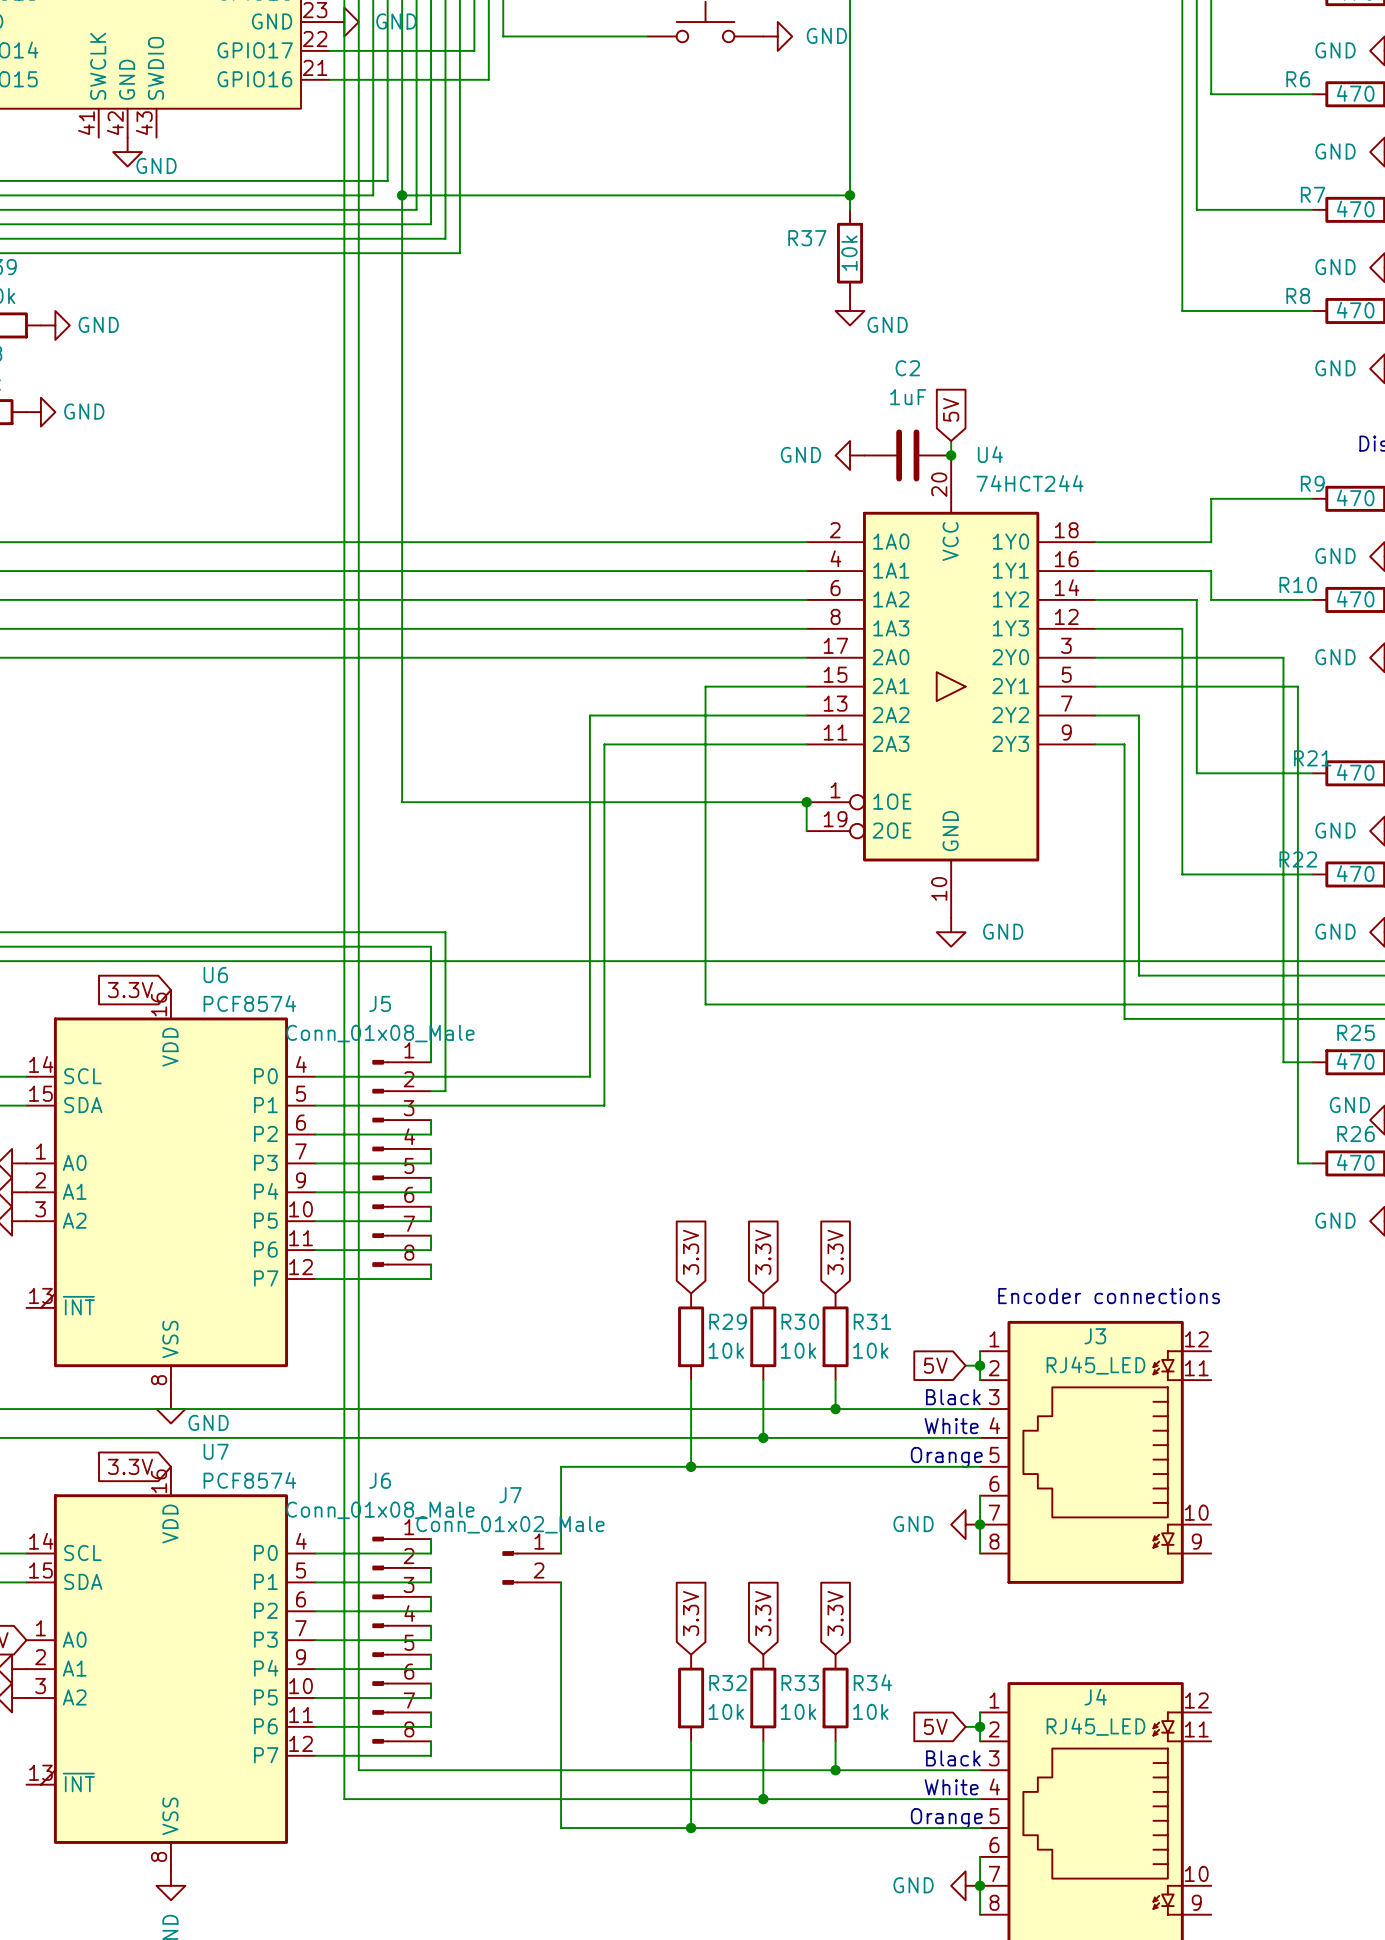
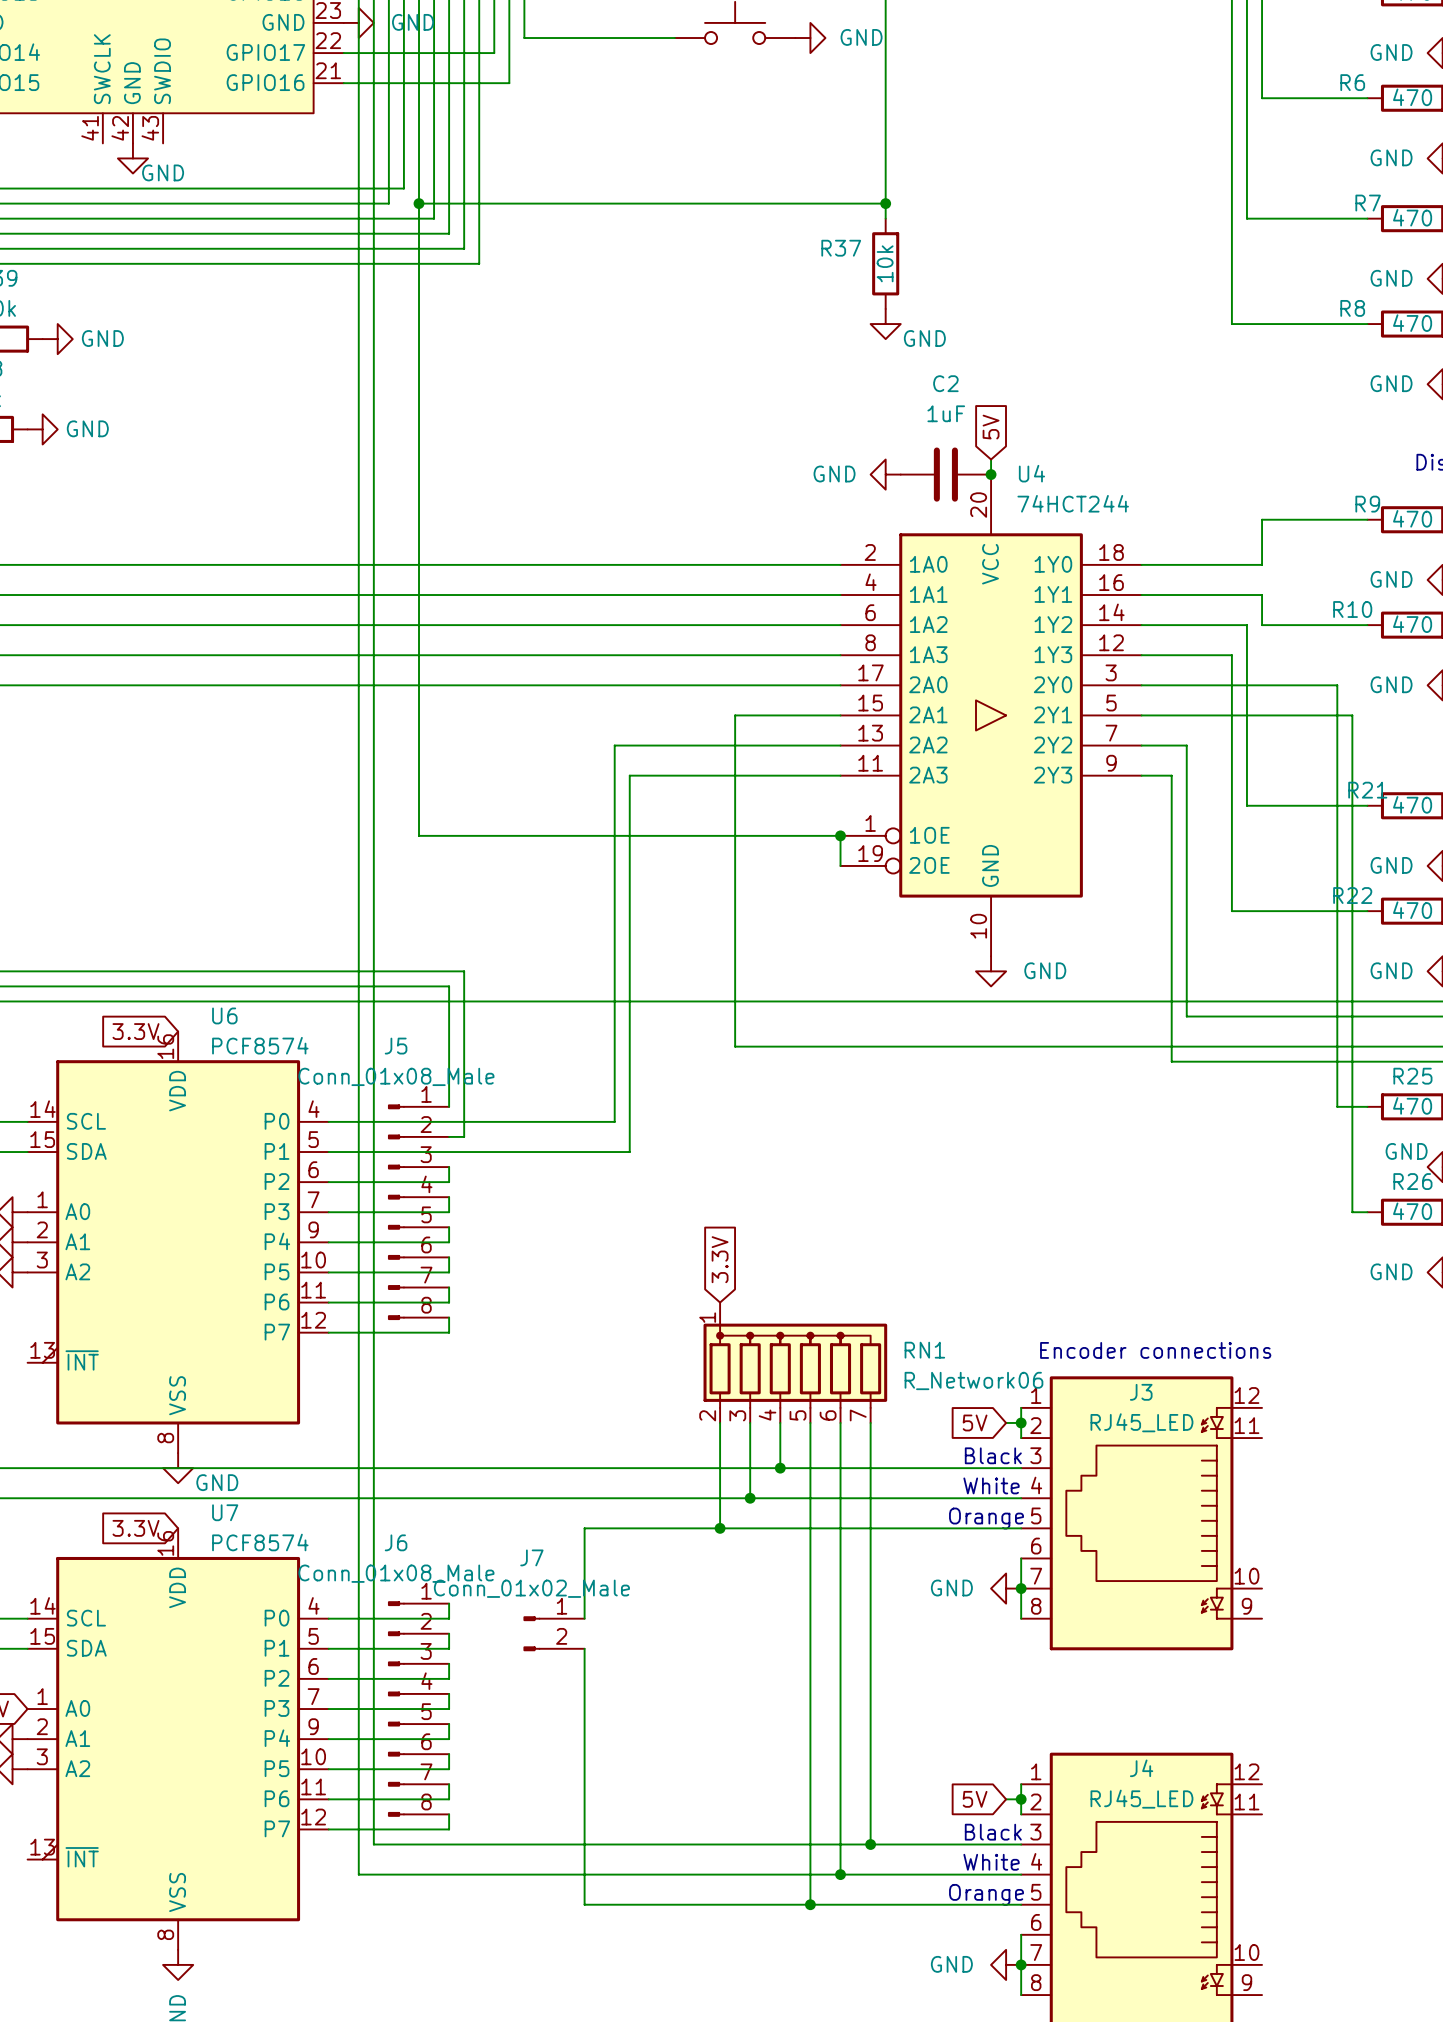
global label position: 3.3V (691, 1252) -> 3.3V (720, 1259)
global label: 3.3V (763, 1252) -> none
global label: 3.3V (835, 1252) -> none
RN1: none -> R_Network06 (795, 1362)
R29: 10k (691, 1336) -> none
R30: 10k (763, 1336) -> none
R31: 10k (835, 1336) -> none
wire: none -> (750, 1422) (750, 1498)
wire: none -> (780, 1422) (780, 1468)
wire: none -> (810, 1422) (810, 1904)
wire: none -> (840, 1422) (840, 1874)
wire: (763, 1380) (763, 1437) -> none
junction: none -> (780, 1468)
wire: none -> (870, 1468) (870, 1814)
junction: (835, 1409) -> none
junction: none -> (750, 1498)
junction: (763, 1437) -> none
global label: 3.3V (691, 1613) -> none
global label: 3.3V (763, 1613) -> none
global label: 3.3V (835, 1613) -> none
R32: 10k (691, 1697) -> none
R33: 10k (763, 1697) -> none
R34: 10k (835, 1697) -> none
wire: (691, 1741) (691, 1828) -> none
wire: (763, 1741) (763, 1799) -> none
junction: (763, 1799) -> none
junction: none -> (840, 1874)
junction: (691, 1828) -> none
junction: none -> (810, 1904)

